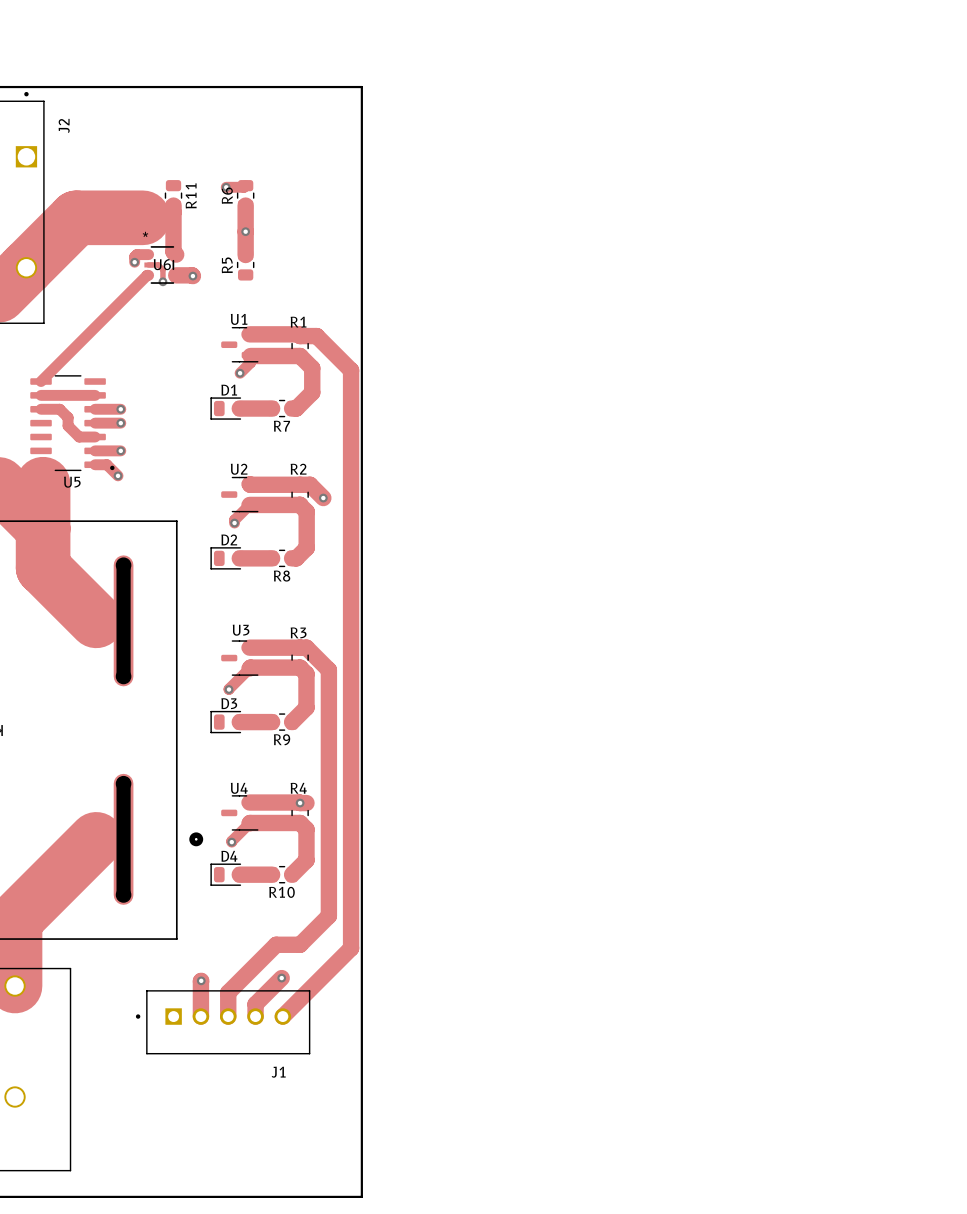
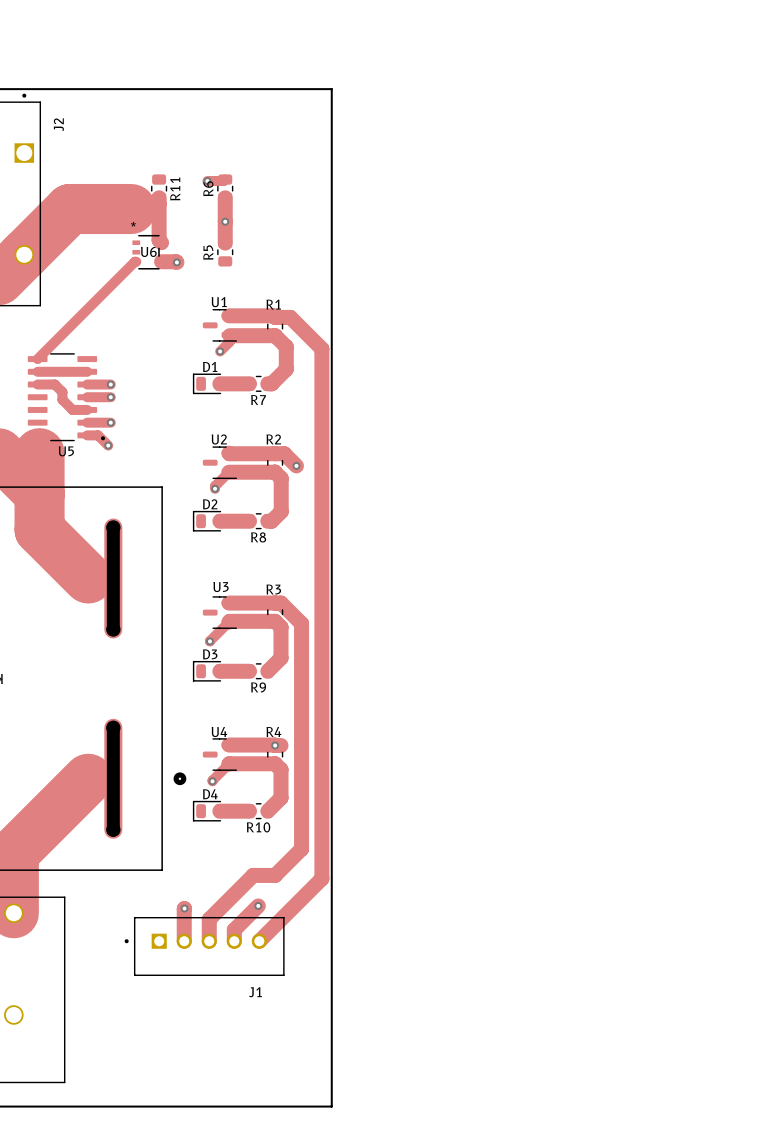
track: (148, 254) (136, 254) (134, 256) (134, 262) -> none
via: (134, 262) -> none
track: (148, 264) (158, 264) (162, 269) (162, 281) -> none
via: (162, 281) -> none

